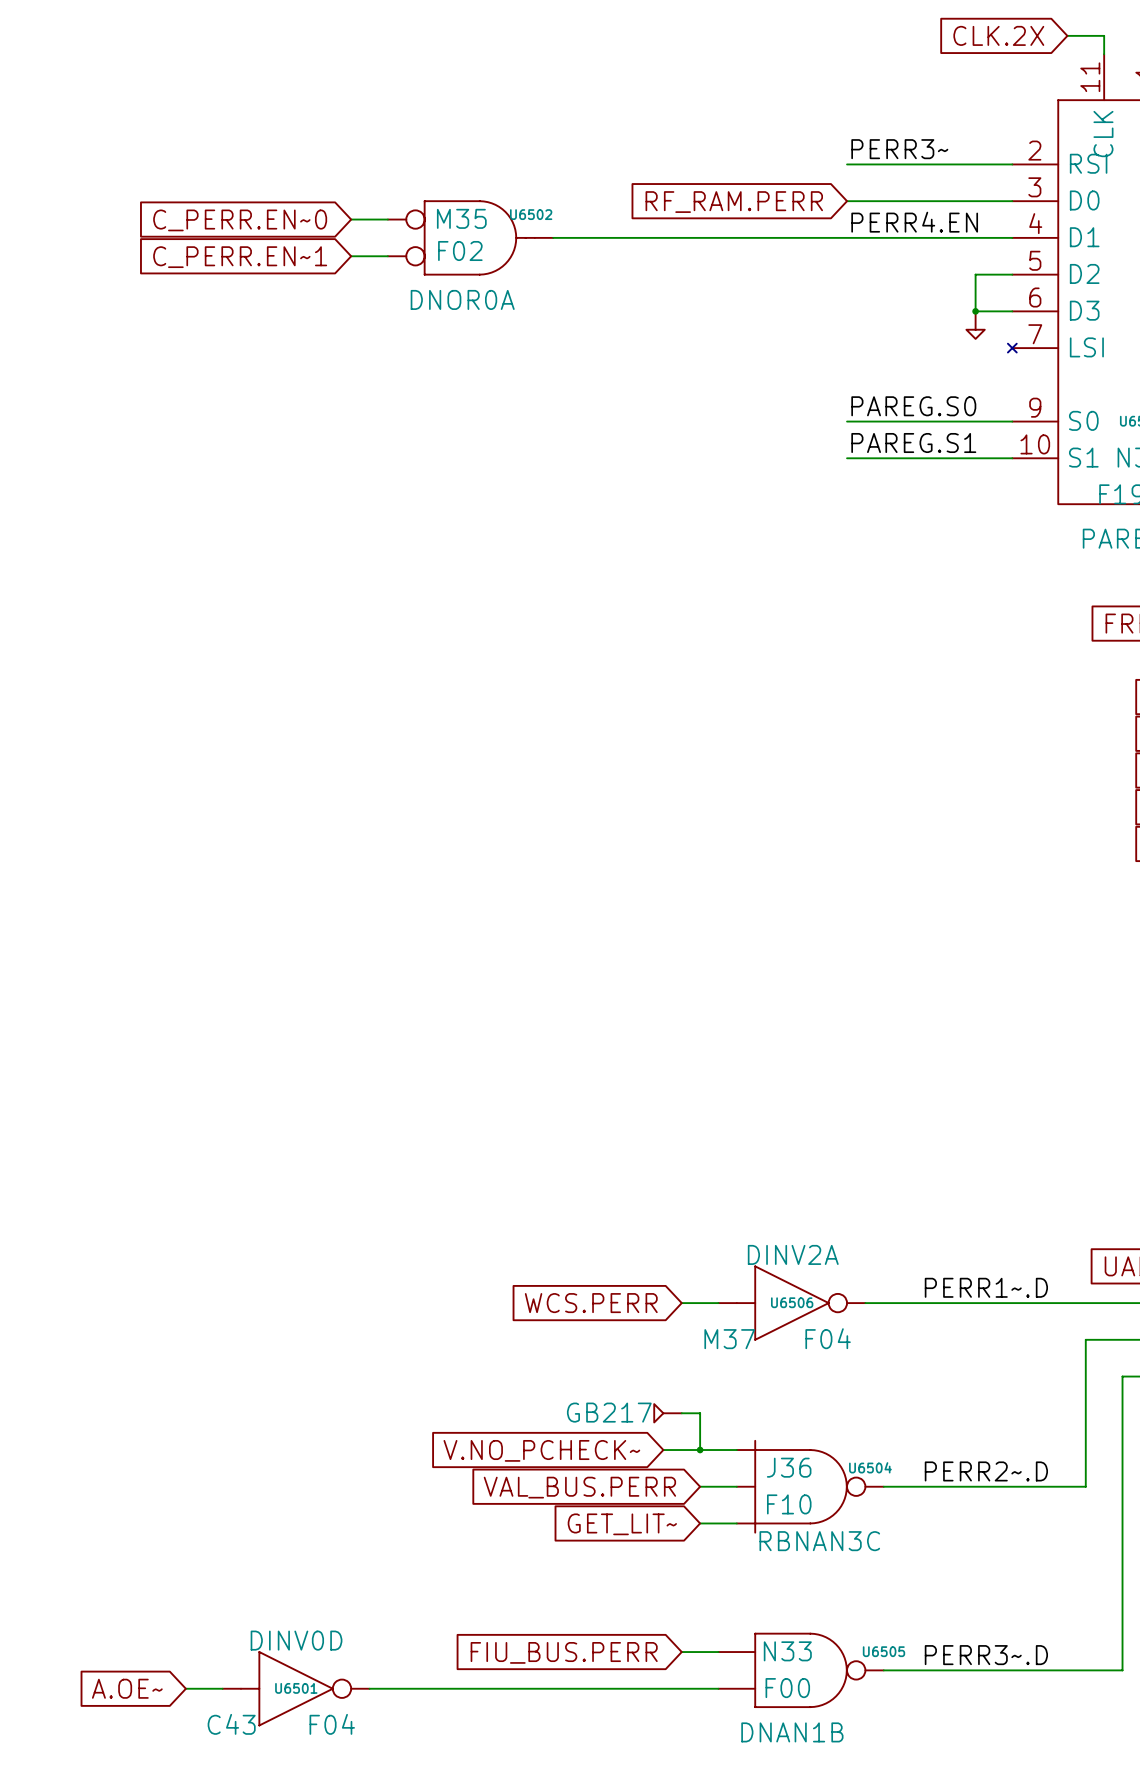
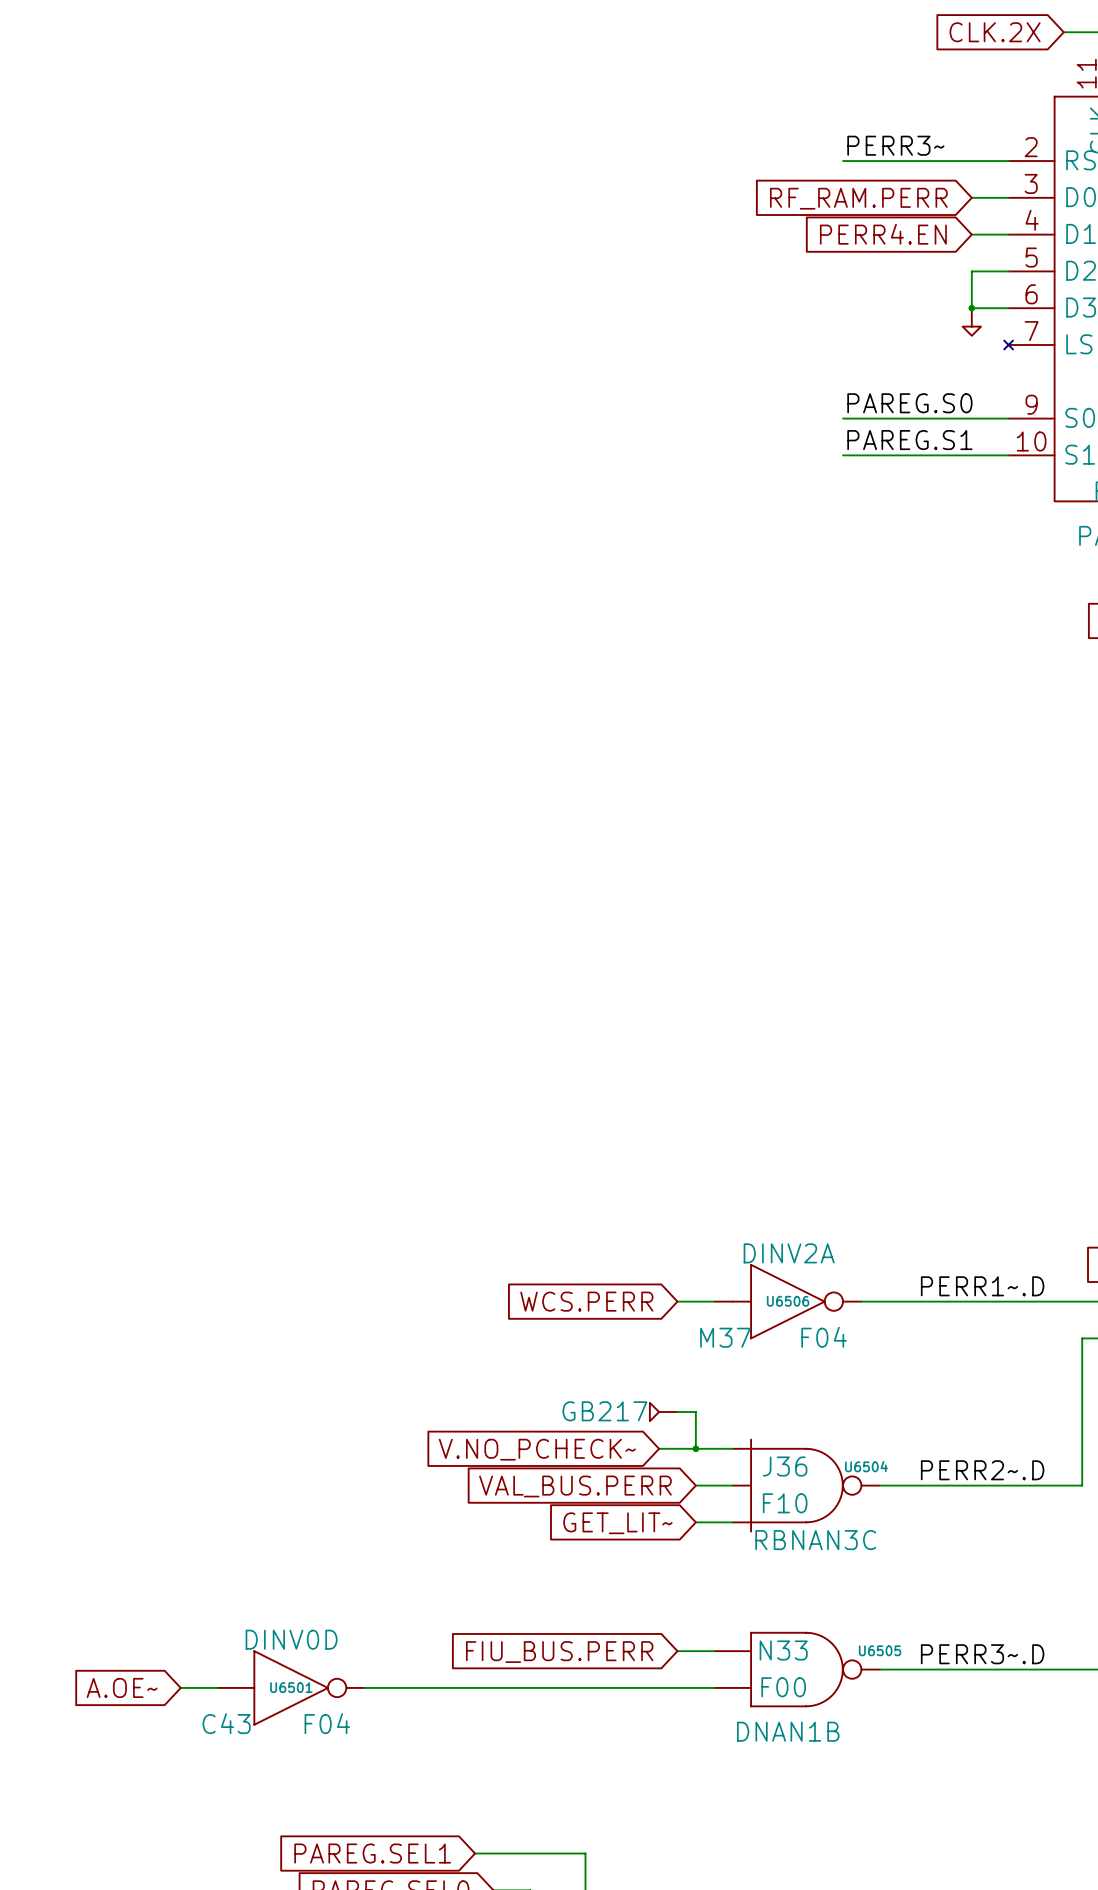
wire: (847, 201) (975, 201) -> none
global label position: RF_RAM.PERR (734, 202) -> RF_RAM.PERR (858, 198)
wire: (351, 219) (387, 219) -> none
global label: C_PERR.EN~0 (240, 220) -> none
label: PERR4.EN (914, 222) -> none
U6502: F02 (470, 237) -> none
wire: (553, 237) (975, 237) -> none
global label: none -> PERR4.EN (883, 234)
wire: (351, 256) (387, 256) -> none
global label: C_PERR.EN~1 (240, 257) -> none

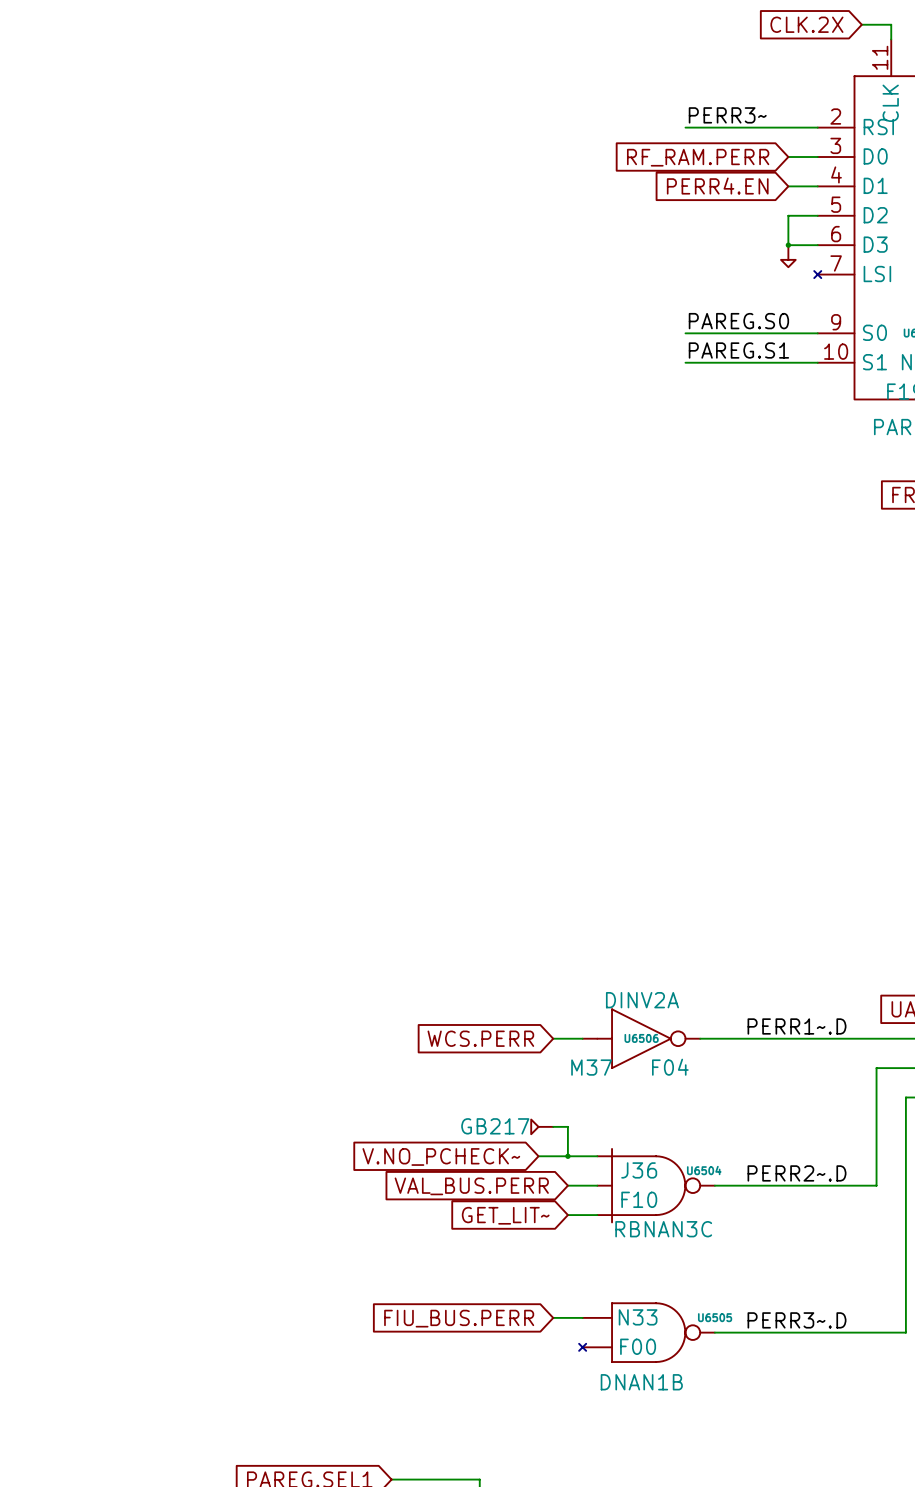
global label: A.OE~ (122, 1687) -> none
wire: (180, 1687) (217, 1687) -> none
U6501: F04 (291, 1687) -> none
wire: (364, 1687) (714, 1687) -> none
no-connect mark: none -> (582, 1347)

